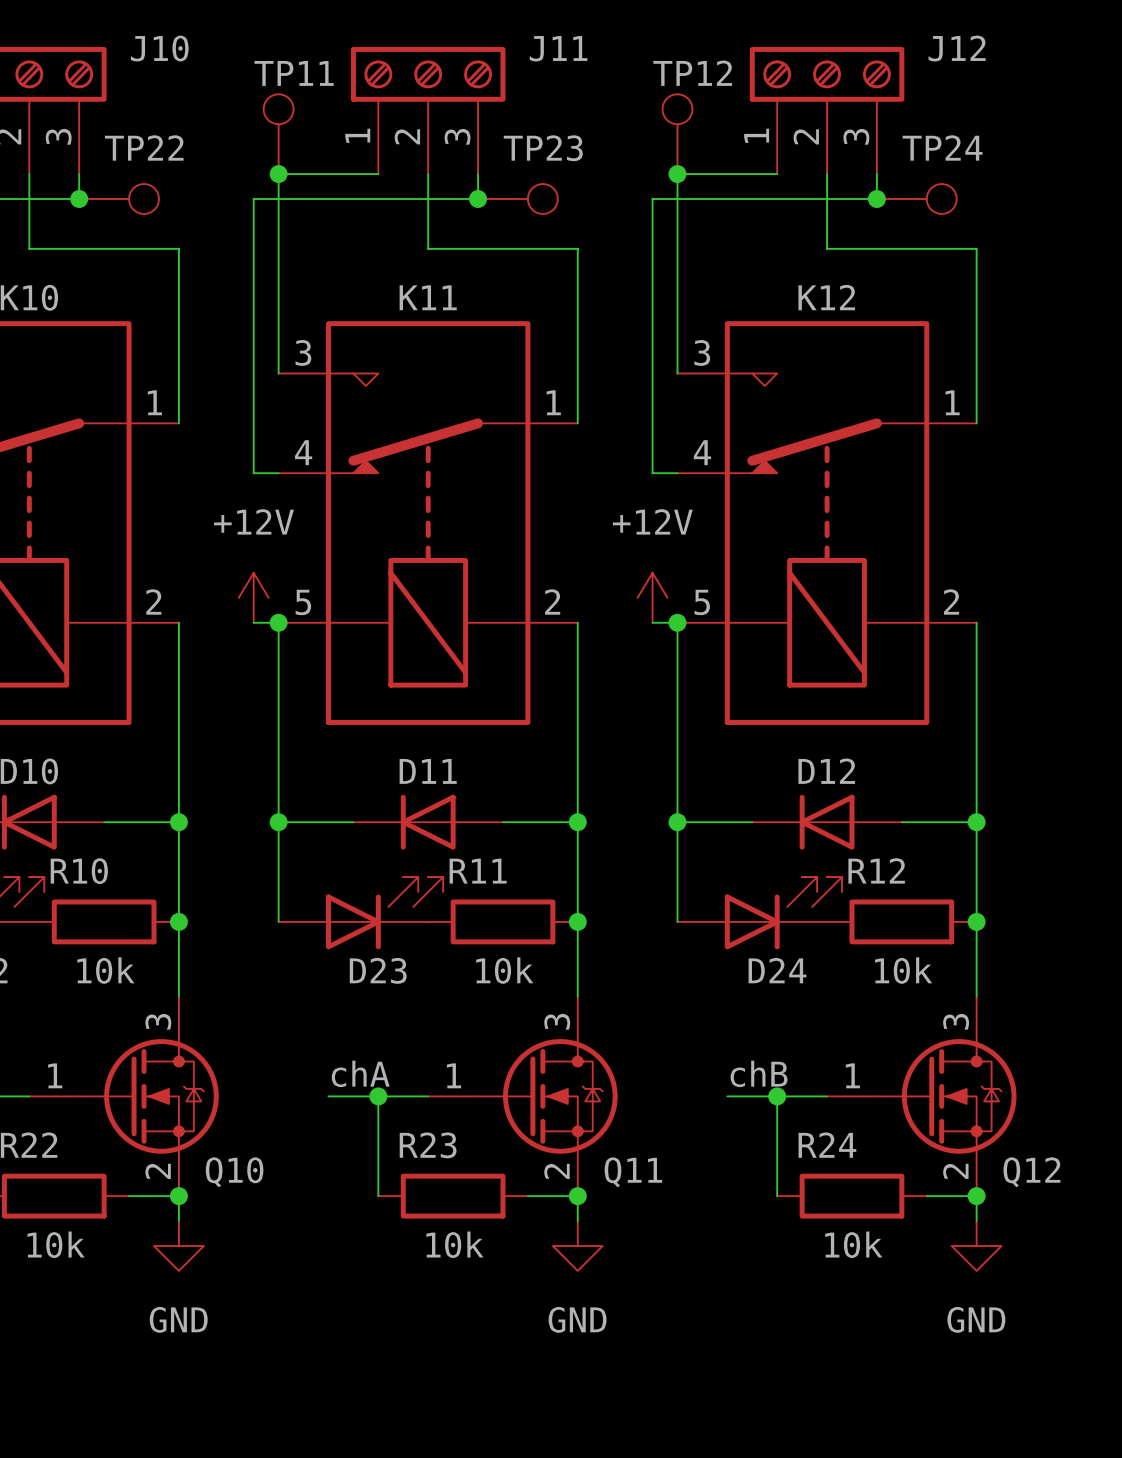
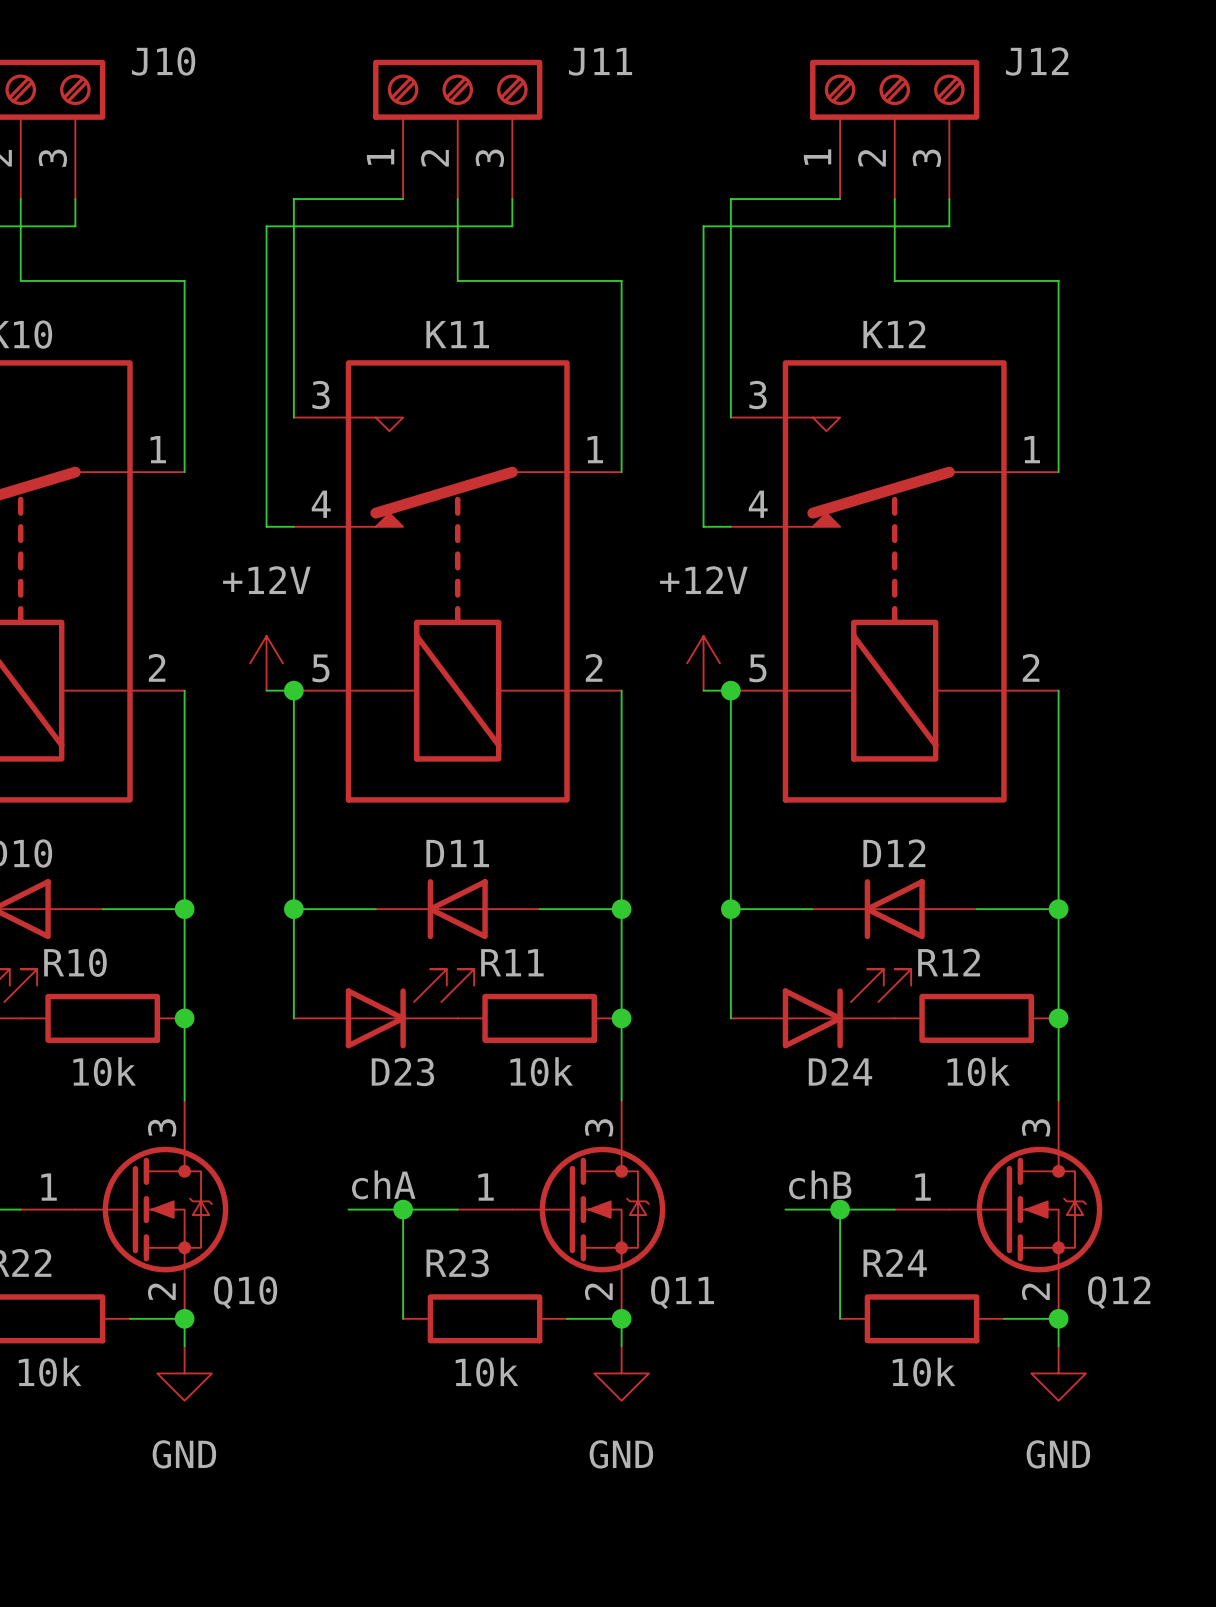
TP11: (278, 134) -> none
TP12: (677, 134) -> none
junction: (278, 174) -> none
junction: (677, 174) -> none
junction: (79, 199) -> none
TP22: (119, 199) -> none
junction: (478, 199) -> none
TP23: (517, 199) -> none
junction: (876, 199) -> none
TP24: (916, 199) -> none

